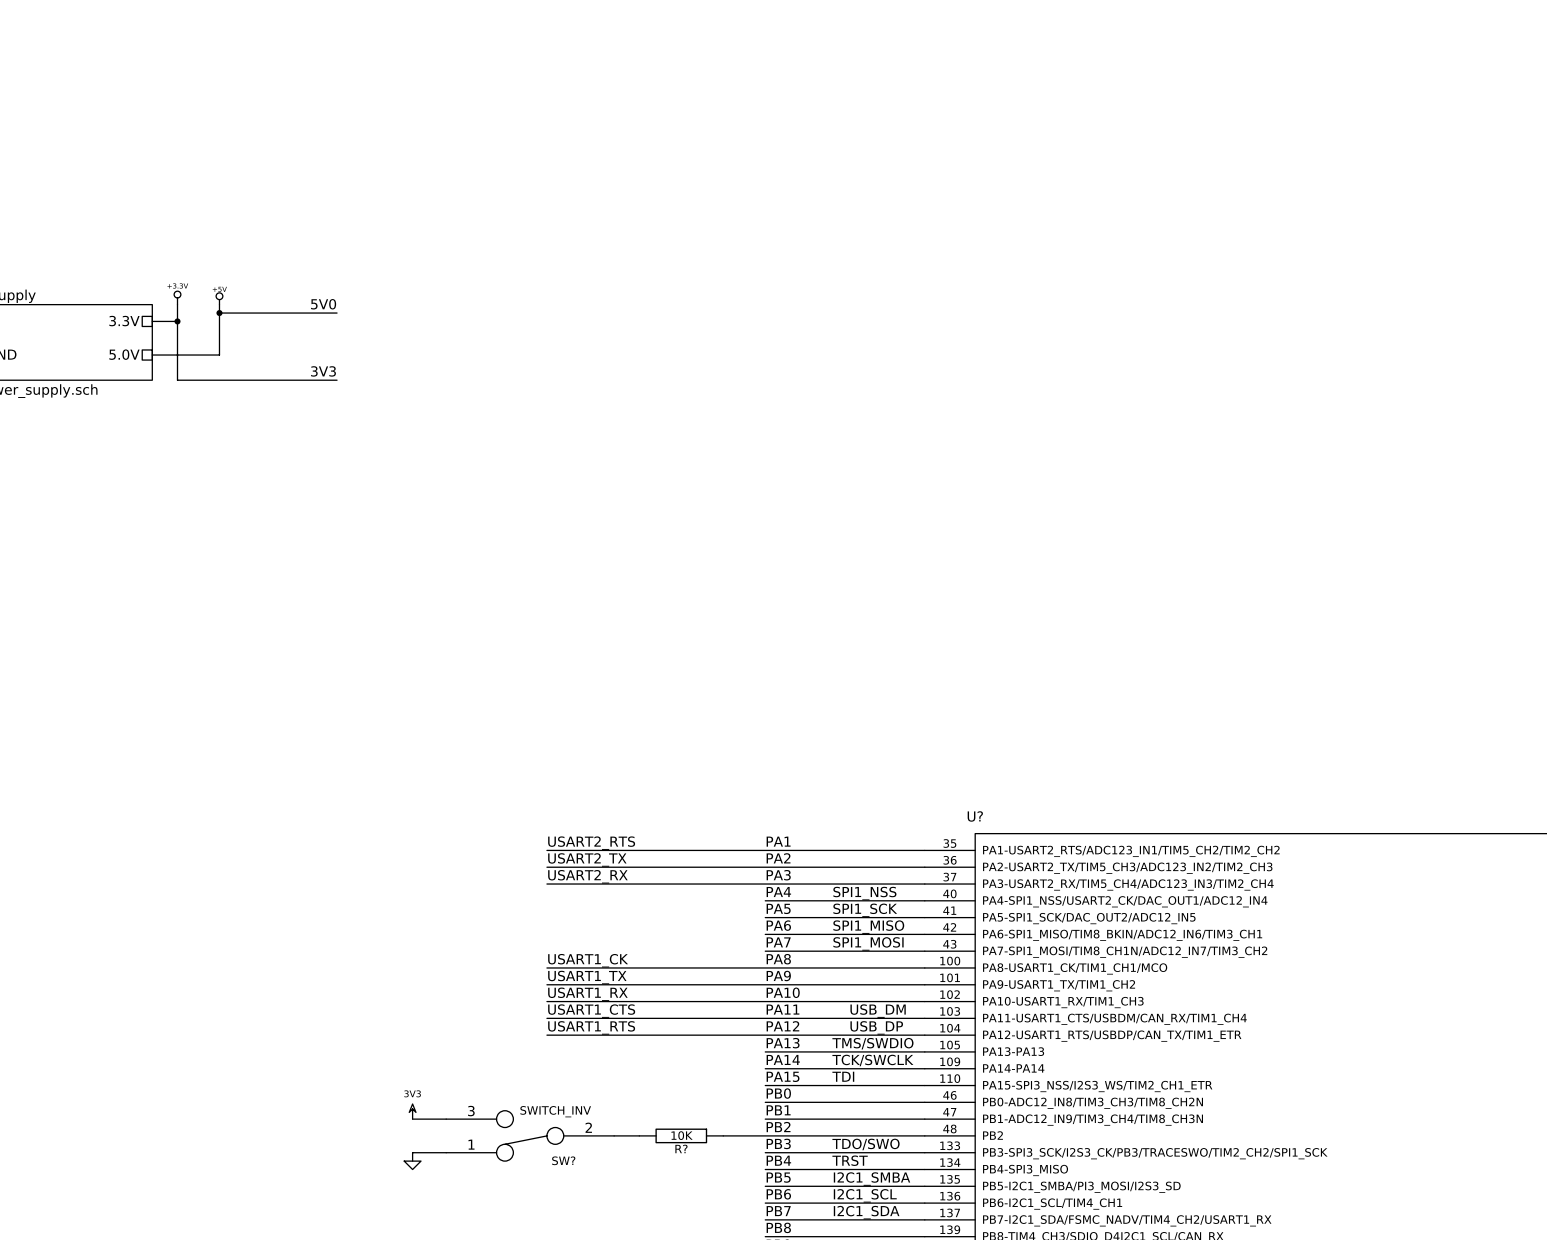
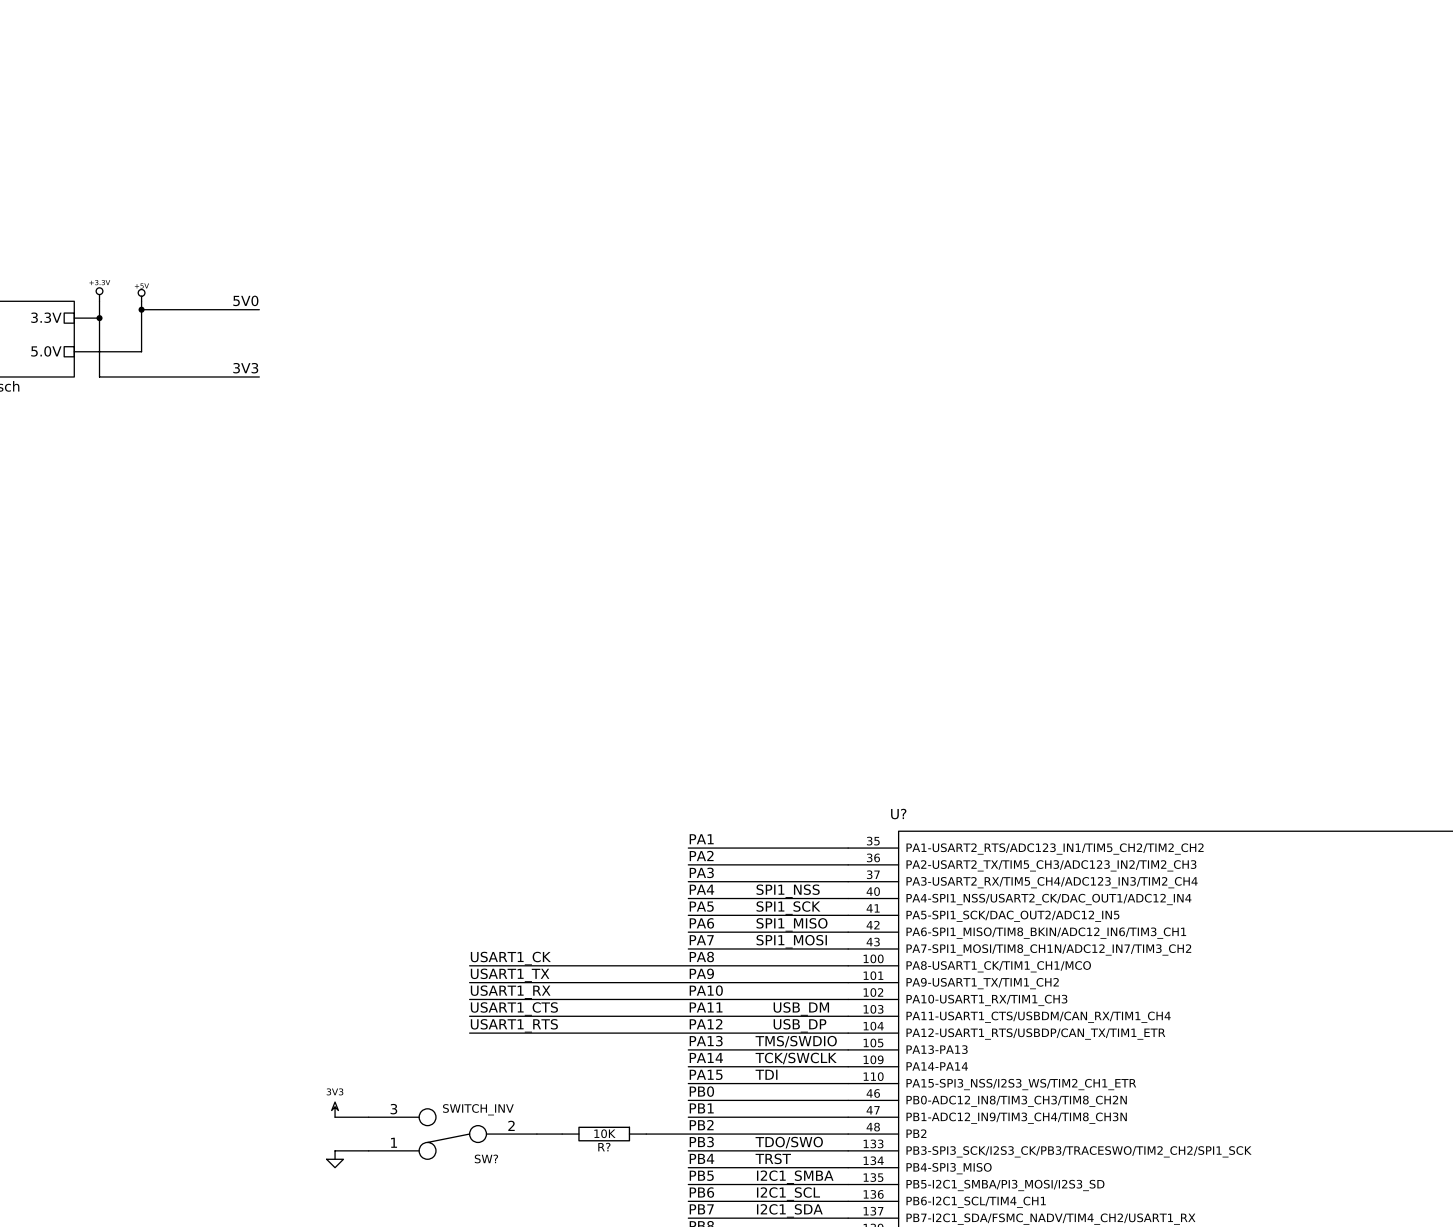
label: USART2_RTS (591, 843) -> none
wire: (546, 850) (765, 850) -> none
label: USART2_TX (587, 859) -> none
wire: (546, 867) (765, 867) -> none
label: USART2_RX (587, 876) -> none
wire: (546, 884) (765, 884) -> none

